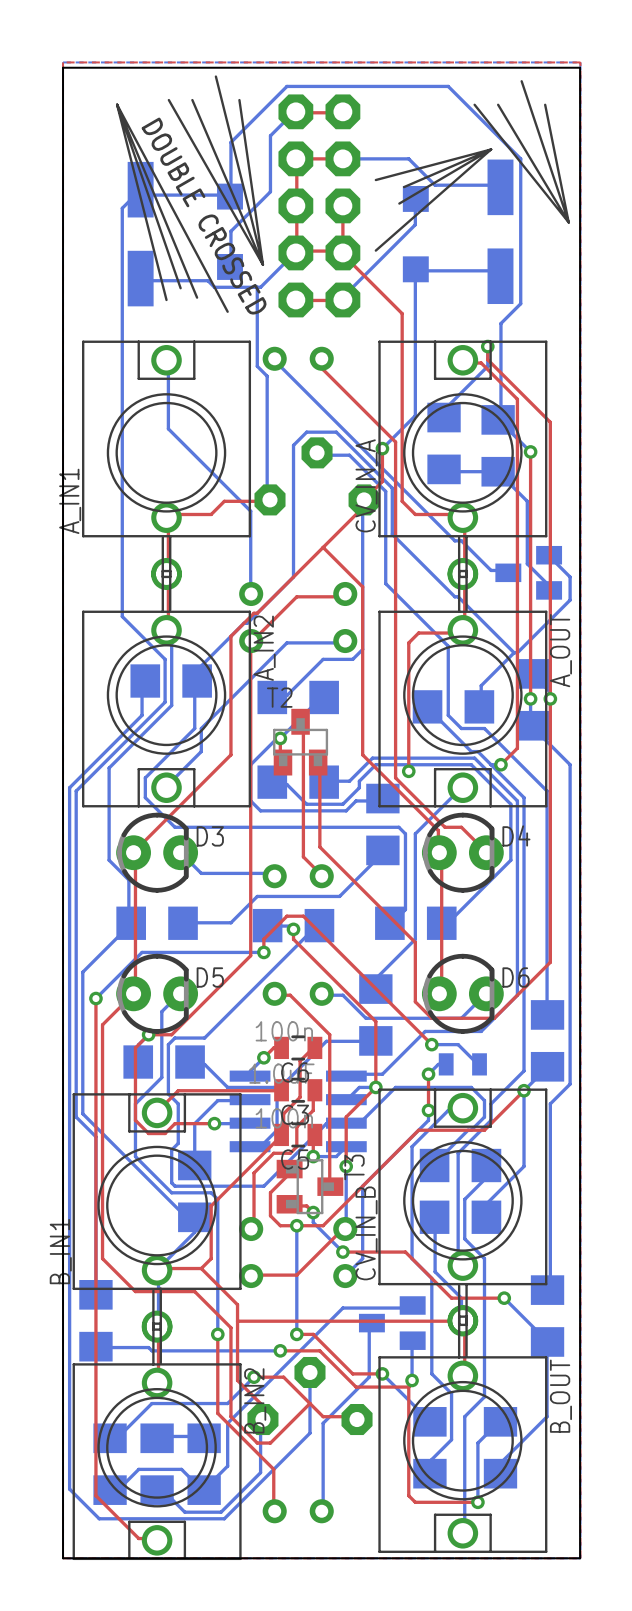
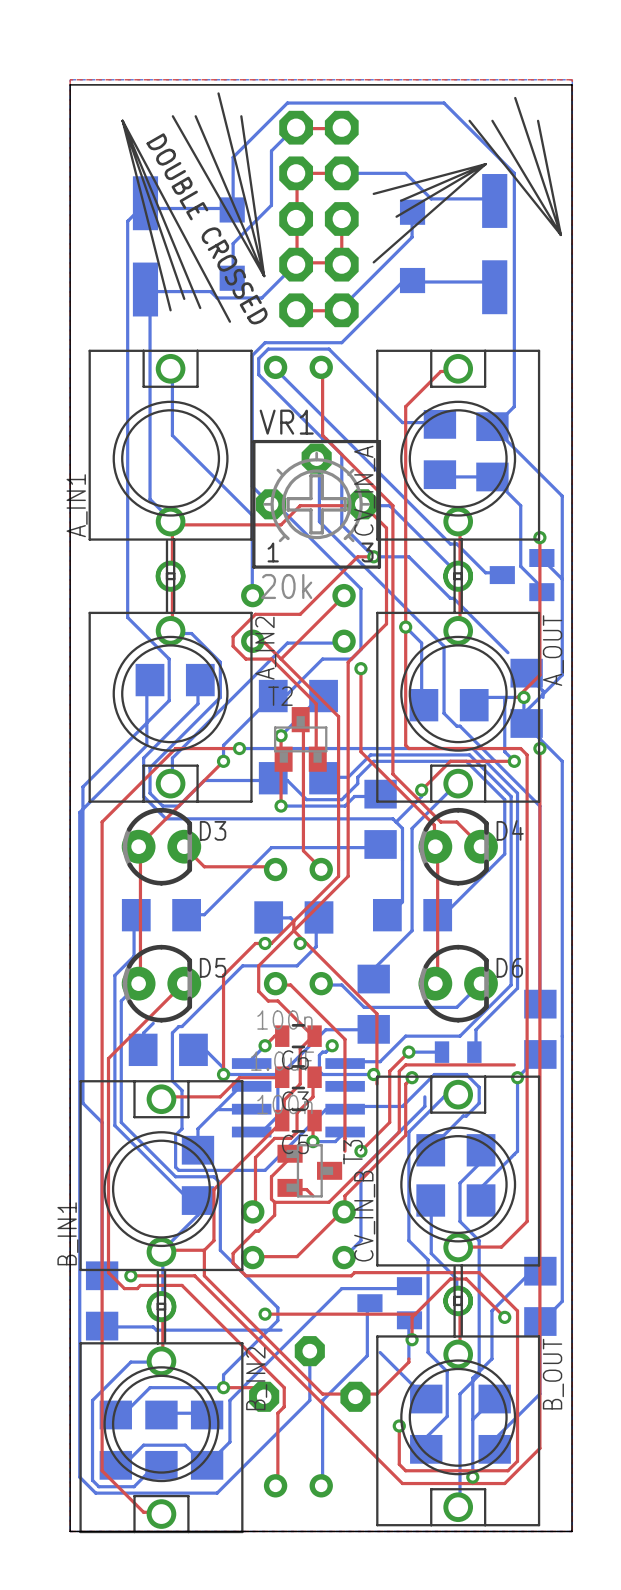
top track: (342, 252) (402, 313) (402, 501) (415, 514) (461, 514) (462, 517) -> none
bottom track: (415, 270) (415, 415) (382, 448) -> (412, 281) (402, 281) (341, 342) (265, 342) (252, 355) (252, 486) (268, 502)
bottom track: none -> (145, 289) (150, 291) (150, 499) (170, 521)
bottom track: (257, 287) (257, 349) -> (439, 424) (437, 422) (402, 422) (328, 349) (268, 349) (258, 358)
bottom track: (520, 303) (500, 323) (500, 419) -> (514, 313) (514, 406) (495, 425)
bottom track: (487, 346) (487, 366) (444, 409) (444, 417) -> none
top track: (487, 346) (487, 359) (550, 422) (550, 962) (494, 1018) (431, 1018) (415, 1001) (415, 942) (319, 847) (319, 764) (318, 762) -> none
via: (487, 346) -> none
top track: (462, 360) (464, 363) (481, 363) (517, 399) (517, 748) (500, 764) -> (458, 368) (456, 371) (440, 371) (405, 406) (405, 643)
top track: (323, 369) (395, 442) (395, 501) -> (322, 377) (322, 435) (392, 505)
bottom track: (267, 376) (267, 498) -> (268, 384) (322, 438)
bottom track: (323, 432) (306, 432) (293, 445) (293, 577) (198, 669) (197, 681) -> none
bottom track: (326, 432) (336, 432) (392, 488) (392, 534) (412, 554) -> (325, 438) (341, 454) (341, 524) (373, 556) (408, 556)
top track: (382, 448) (382, 481) (364, 499) -> (313, 1036) (277, 1001) (268, 1001) (258, 991) (258, 965) (348, 876) (348, 662) (386, 623) (386, 528) (362, 504)
via: (382, 448) -> none
bottom track: none -> (523, 457) (562, 496) (562, 579)
top track: (530, 451) (530, 698) -> none
via: (530, 451) -> none
bottom track: (319, 455) (349, 455) (385, 491) (385, 583) -> (319, 460) (319, 521) (383, 585)
VR1 side: bottom (317, 476) -> top (316, 504)
top track: (270, 499) (224, 501) (211, 514) (168, 514) (166, 517) -> (360, 505) (300, 505) (281, 524) (172, 524) (170, 521)
bottom track: (364, 499) (362, 586) -> (271, 504) (277, 505) (360, 588)
bottom track: none -> (362, 504) (389, 505) (456, 572) (458, 576)
top track: (362, 501) (362, 507) (257, 613) -> (373, 556) (357, 556) (300, 614) (258, 614)
top track: none -> (539, 537) (539, 675) (517, 697)
via: none -> (539, 537)
top track: (323, 547) (362, 586) (362, 669) -> none
via: none -> (373, 556)
top track: (342, 596) (296, 596) (251, 641) (250, 955) -> (252, 641) (265, 643) (338, 716) (338, 876) (271, 943) (255, 943) (252, 946)
top track: none -> (341, 598) (281, 659)
bottom track: (570, 600) (481, 685) (481, 705) -> (562, 601) (562, 675) (527, 710) (526, 723)
via: none -> (405, 627)
top track: (462, 630) (461, 633) (418, 633) (408, 642) -> none
bottom track: (168, 633) (171, 636) (171, 705) (109, 768) (109, 860) (128, 879) (128, 922) (131, 923) -> none
top track: (230, 646) (230, 754) (221, 764) -> (233, 646) (245, 659) (271, 659) (316, 703) (316, 758) (317, 759)
via: none -> (360, 668)
bottom track: none -> (273, 696) (223, 745) (223, 761)
bottom track: none -> (517, 697) (482, 697) (475, 703)
via: (550, 698) -> none
bottom track: (194, 705) (194, 728) (145, 777) -> (172, 633) (191, 633) (220, 662) (220, 697) (150, 767) (150, 774)
bottom track: none -> (197, 703) (143, 758) (143, 796) (166, 818) (392, 818) (396, 822) (421, 796) (421, 790)
bottom track: (427, 706) (471, 751) -> (423, 705) (421, 703) (421, 643) (405, 627)
bottom track: (142, 715) (69, 787) (69, 1489) (86, 1505) -> (146, 713) (146, 745) (79, 812) (79, 1477) (95, 1493) (105, 1493)
bottom track: (201, 728) (201, 751) (168, 784) -> (204, 726) (172, 758) (172, 780)
bottom track: (464, 728) (484, 728) (510, 754) -> (504, 697) (504, 751)
bottom track: (280, 738) (277, 738) (250, 764) (250, 800) (260, 810) (280, 810) -> none
top track: (408, 748) (408, 771) -> (405, 745) (408, 748) (520, 748) (527, 754) (527, 1221) (501, 1247) (458, 1247)
bottom track: none -> (239, 748) (466, 748)
top track: none -> (239, 748) (175, 748) (102, 822) (102, 988)
via: none -> (239, 748)
top track: none -> (539, 748) (539, 1448) (504, 1483) (402, 1483) (194, 1275) (130, 1275)
via: none -> (539, 748)
top track: none -> (283, 759) (281, 761) (281, 806)
via: none -> (223, 761)
via position: (500, 764) -> (514, 761)
bottom track: (520, 764) (547, 791) (547, 810) -> (460, 726) (539, 806)
top track: none -> (514, 761) (450, 761) (421, 790)
via position: (408, 771) -> (421, 790)
bottom track: (158, 810) (174, 827) (398, 827) -> (162, 806) (178, 806) (204, 780) (271, 780) (273, 778)
via: none -> (281, 806)
bottom track: (180, 852) (201, 873) (273, 873) (274, 876) -> none
top track: none -> (184, 846) (204, 866) (274, 866) (275, 869)
bottom track: (382, 853) (339, 896) (257, 896) (230, 922) (201, 922) -> (380, 847) (271, 847) (204, 914)
bottom track: (128, 926) (82, 972) (82, 1113) (109, 1140) -> (114, 975) (114, 1125)
bottom track: (316, 926) (204, 1038) (178, 1038) -> (316, 917) (316, 946) (297, 965) (242, 965) (181, 1026)
via position: (293, 929) -> (300, 943)
bottom track: (263, 952) (142, 952) (128, 965) -> (134, 917) (134, 956)
top track: (263, 952) (263, 939) (286, 916) (303, 916) (431, 1044) -> none
bottom track: (109, 985) (95, 998) -> none
top track: (221, 985) (171, 1034) (148, 1034) (135, 1047) (135, 1120) (148, 1133) (165, 1133) (174, 1123) (214, 1123) -> (223, 975) (223, 1074)
top track: (133, 993) (102, 1024) (102, 1070) -> (184, 983) (108, 1058)
bottom track: (180, 993) (161, 1011) (161, 1077) (135, 1103) (135, 1156) -> (138, 983) (121, 1001) (121, 1122) (140, 1141)
via: (95, 998) -> none
bottom track: (524, 998) (524, 1070) (491, 1103) (491, 1120) (458, 1153) (458, 1261) (462, 1265) -> none
top track: (375, 1021) (375, 1087) (346, 1117) -> (373, 1010) (376, 1013) (376, 1084)
bottom track: (481, 1031) (425, 1031) (408, 1047) -> (475, 1020) (460, 1036) (405, 1036)
via: (148, 1034) -> none
top track: (329, 1034) (330, 1186) -> (328, 1023) (344, 1039) (344, 1103)
bottom track: (431, 1044) (458, 1044) (479, 1064) -> (517, 988) (475, 1029) (475, 1052) (474, 1052)
via: (431, 1044) -> none
via: none -> (332, 1045)
top track: none -> (408, 1052) (389, 1071) (389, 1122) (360, 1151)
via: none -> (408, 1052)
bottom track: (438, 1064) (428, 1074) -> (434, 1052) (408, 1052)
top track: (428, 1074) (428, 1110) -> none
via: (428, 1074) -> none
bottom track: (570, 1084) (550, 1103) (550, 1288) (547, 1290) -> (562, 1071) (562, 1301) (540, 1321)
bottom track: (359, 1087) (349, 1097) -> (357, 1074) (322, 1074) (319, 1071) (319, 1055) (332, 1045)
bottom track: (438, 1087) (395, 1087) (362, 1120) -> (434, 1074) (402, 1106) (360, 1106)
top track: (237, 1090) (178, 1090) (158, 1110) -> (239, 1077) (220, 1096) (162, 1096)
top track: none -> (412, 1077) (405, 1084) (405, 1135) (344, 1195) (344, 1211)
via: none -> (412, 1077)
top track: (524, 1090) (484, 1130) (418, 1130) (402, 1146) -> (514, 1064) (405, 1064) (399, 1071) (399, 1132)
bottom track: (237, 1100) (217, 1100) (194, 1123) (194, 1143) -> (239, 1087) (197, 1128)
via: (428, 1110) -> none
via position: (214, 1123) -> (223, 1074)
bottom track: (346, 1166) (345, 1229) -> none
via position: (346, 1166) -> (360, 1151)
bottom track: (313, 1212) (313, 1222) (342, 1252) -> none
via: (313, 1212) -> none
top track: (273, 1219) (280, 1225) (323, 1225) (329, 1219) -> (399, 1426) (399, 1464) (405, 1470) (507, 1470) (517, 1461) (517, 1310) (479, 1272) (354, 1272) (351, 1275) (245, 1275) (233, 1263) (233, 1253) (274, 1215) (274, 1202) (328, 1202)
bottom track: (296, 1225) (296, 1334) -> none
via: (296, 1225) -> none
top track: (342, 1252) (405, 1252) (451, 1298) (454, 1298) -> (412, 1339) (412, 1317) (450, 1279)
via: (342, 1252) -> none
top track: (102, 1258) (135, 1291) (194, 1291) (230, 1327) (230, 1416) (257, 1443) (270, 1443) (277, 1436) -> (108, 1240) (108, 1272) (124, 1288) (137, 1288) (140, 1285) (181, 1285) (284, 1387) (284, 1406)
top track: (201, 1268) (237, 1304) (237, 1380) (260, 1403) (260, 1416) -> (204, 1250) (204, 1275) (284, 1355)
bottom track: (217, 1268) (217, 1334) -> (220, 1250) (277, 1307) (277, 1320) (223, 1374) (223, 1387) (150, 1387)
bottom track: none -> (540, 1271) (530, 1272) (491, 1310) (491, 1358) (472, 1378) (472, 1419)
via: none -> (130, 1275)
top track: (471, 1298) (504, 1298) -> (466, 1279) (504, 1317)
bottom track: (504, 1298) (547, 1341) -> none
via position: (504, 1298) -> (504, 1317)
top track: (462, 1320) (237, 1321) -> none
top track: (217, 1334) (217, 1413) (273, 1469) (274, 1511) -> (277, 1413) (277, 1483) (275, 1485)
via: (217, 1334) -> none
top track: none -> (265, 1314) (297, 1314)
via: none -> (265, 1314)
via: (296, 1334) -> none
top track: (313, 1334) (352, 1373) (382, 1373) -> (313, 1314) (415, 1314)
top track: (280, 1350) (319, 1350) (356, 1387) (408, 1387) (408, 1495) (415, 1502) (477, 1502) -> none
via: (280, 1350) -> none
via: none -> (412, 1339)
via: (382, 1373) -> none
bottom track: (254, 1377) (227, 1403) (151, 1403) (145, 1410) -> none
top track: (254, 1377) (283, 1377) -> none
via: (254, 1377) -> none
via: (412, 1380) -> none
bottom track: none -> (161, 1361) (130, 1362) (92, 1400) (92, 1480)
top track: none -> (405, 1365) (376, 1394) (357, 1394) (355, 1396)
top track: (309, 1403) (283, 1429) -> none
top track: none -> (223, 1387) (255, 1387) (261, 1394)
via: none -> (223, 1387)
bottom track: (262, 1419) (260, 1419) (260, 1472) -> (309, 1400) (261, 1448)
bottom track: (309, 1423) (309, 1433) (224, 1518) (214, 1518) -> none
via: none -> (399, 1426)
bottom track: (157, 1490) (158, 1492) (165, 1492) (184, 1512) (221, 1512) -> (217, 1493) (223, 1486)
bottom track: (92, 1512) (99, 1518) -> (98, 1486) (134, 1486) (153, 1467) (159, 1467) (161, 1465)

